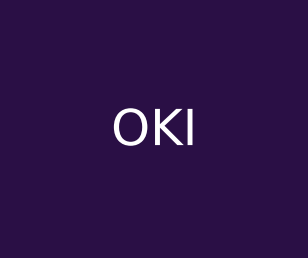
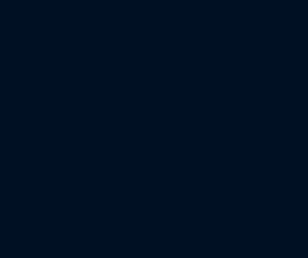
drawing: [113, 108, 193, 146] -> none

